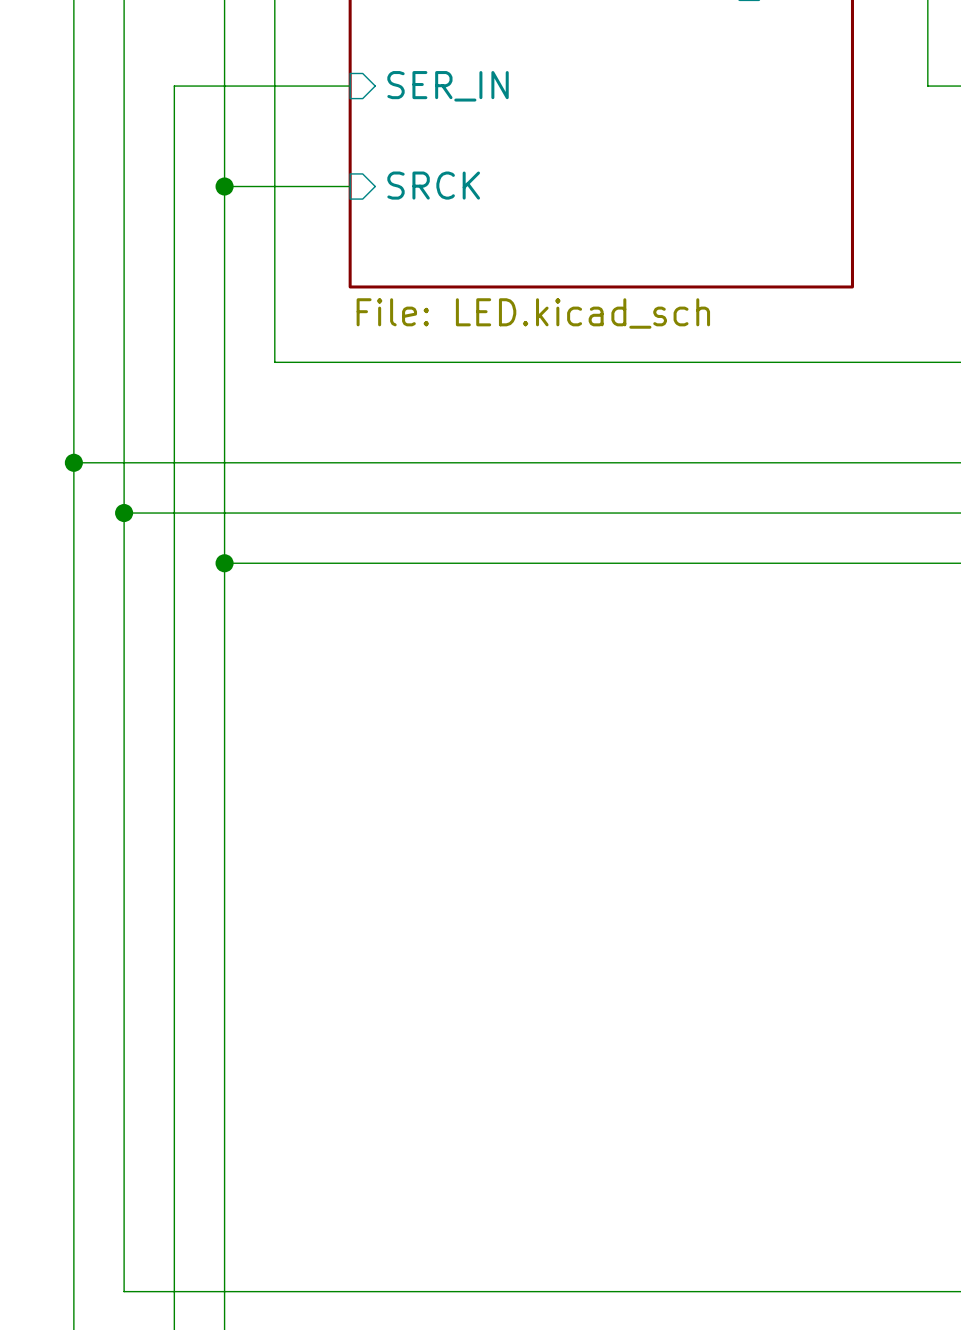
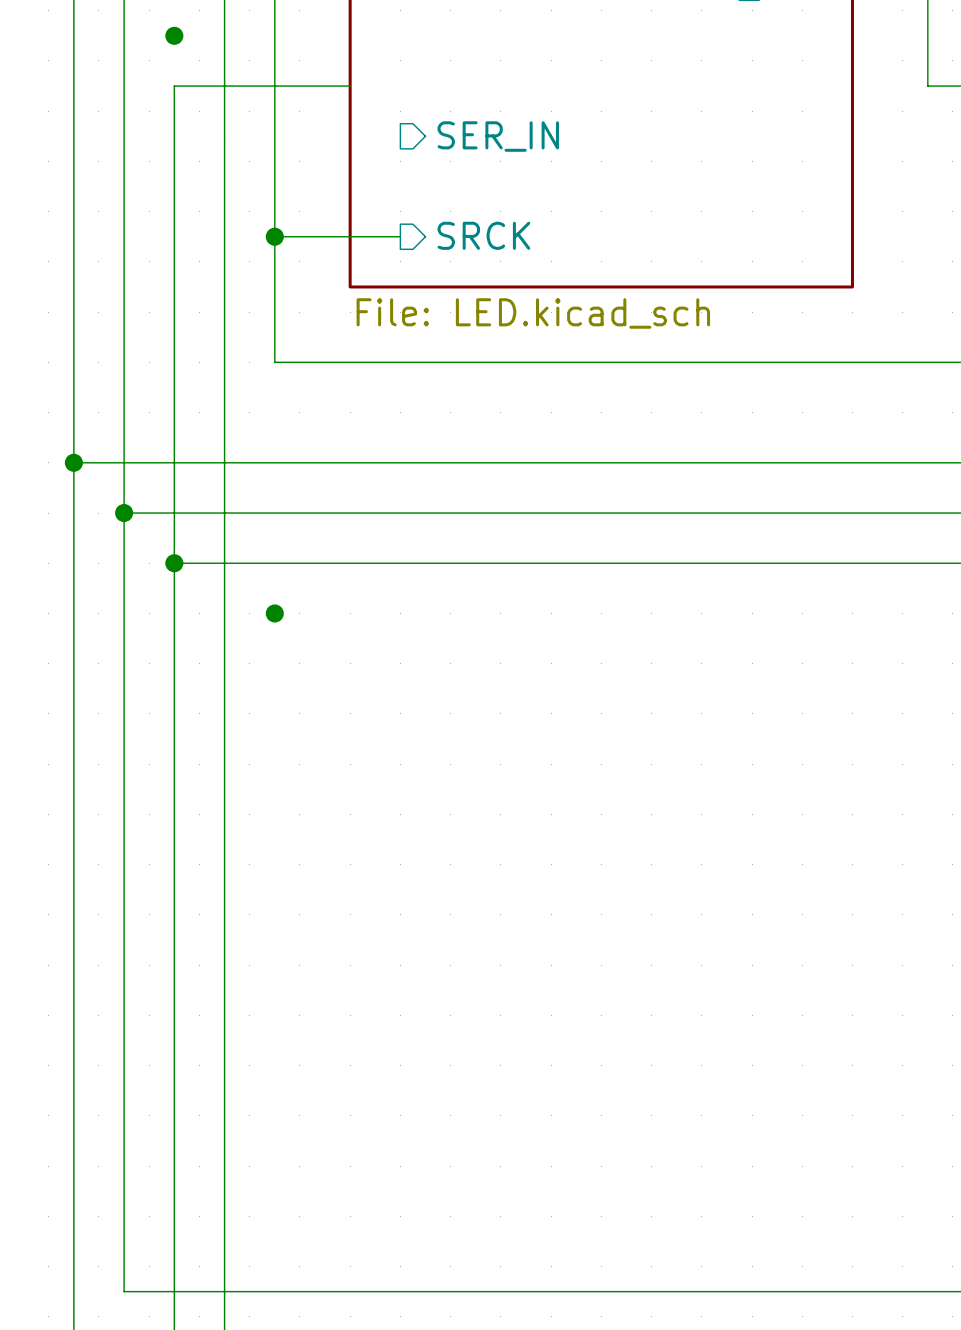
junction: none -> (174, 35)
sheet pin position: SER_IN (448, 86) -> SER_IN (498, 136)
sheet pin position: SRCK (433, 185) -> SRCK (483, 235)
wire: (224, 186) (350, 186) -> (274, 236) (400, 236)
junction position: (224, 186) -> (274, 236)
wire: none -> (174, 563) (224, 563)
junction: none -> (174, 563)
junction: (224, 563) -> none
junction: none -> (274, 613)

